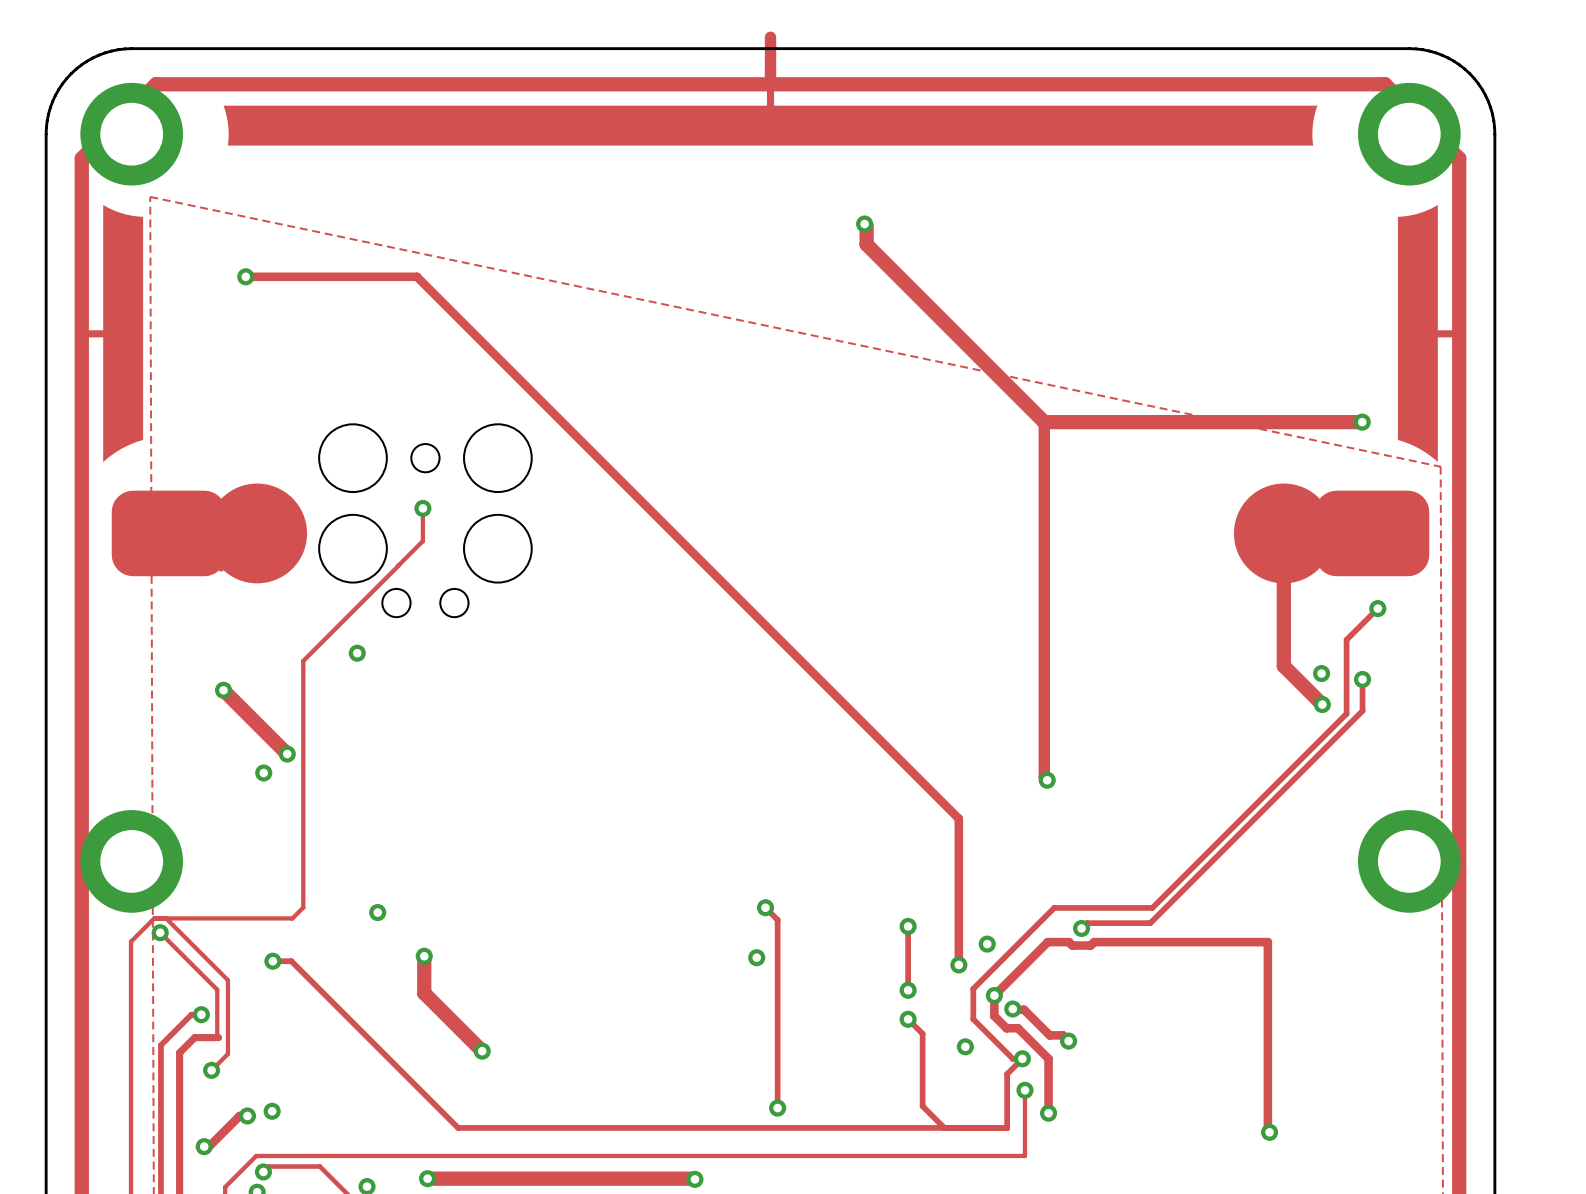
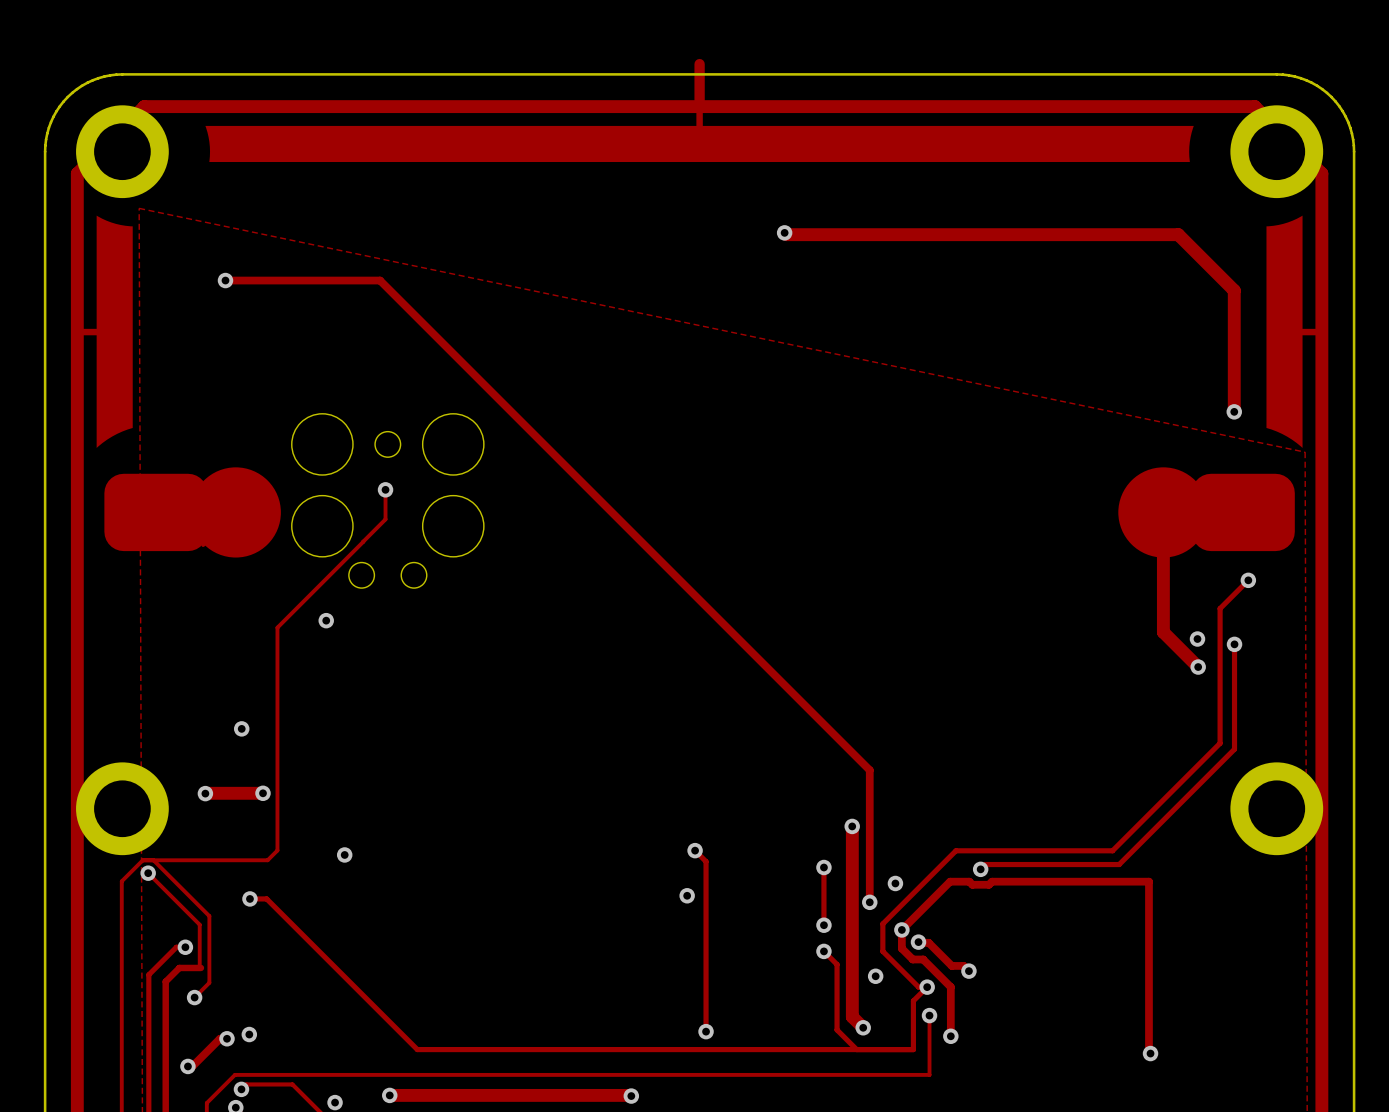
track: (866, 226) (866, 244) (1044, 422) -> none
track: (1044, 422) (1362, 422) -> (786, 234) (1178, 234) (1234, 290) (1234, 411)
track: (1044, 422) (1044, 777) (1047, 780) -> none
track: (223, 690) (287, 754) -> none
via: (223, 690) -> none
track: (1362, 710) (1150, 923) -> (1234, 672) (1234, 749) (1119, 864) (1042, 864)
track: (1346, 713) (1152, 907) -> (1220, 675) (1220, 743) (1112, 850) (1044, 850)
via: (287, 754) -> none
via position: (1047, 780) -> (852, 826)
track: none -> (205, 793) (262, 793)
via: none -> (205, 793)
via: none -> (262, 793)
track: none -> (852, 826) (852, 1016) (863, 1027)
track: (424, 956) (424, 993) (482, 1051) -> none
via: (424, 956) -> none
via: (482, 1051) -> none
via: none -> (863, 1027)

